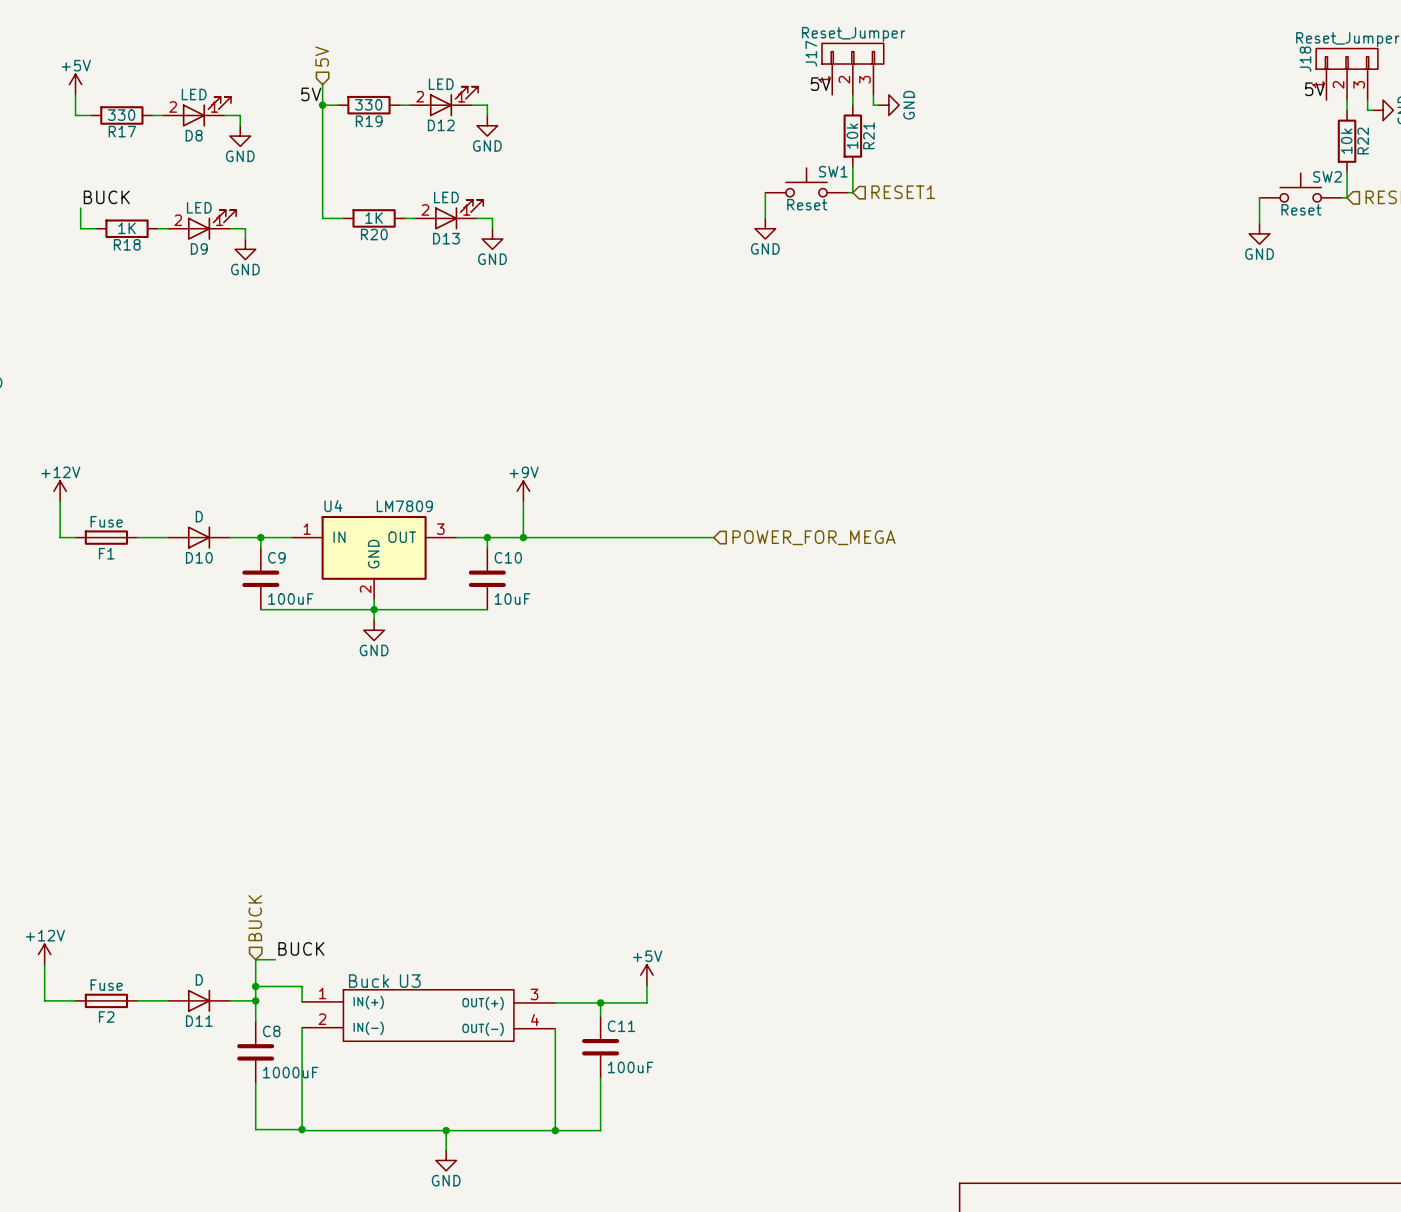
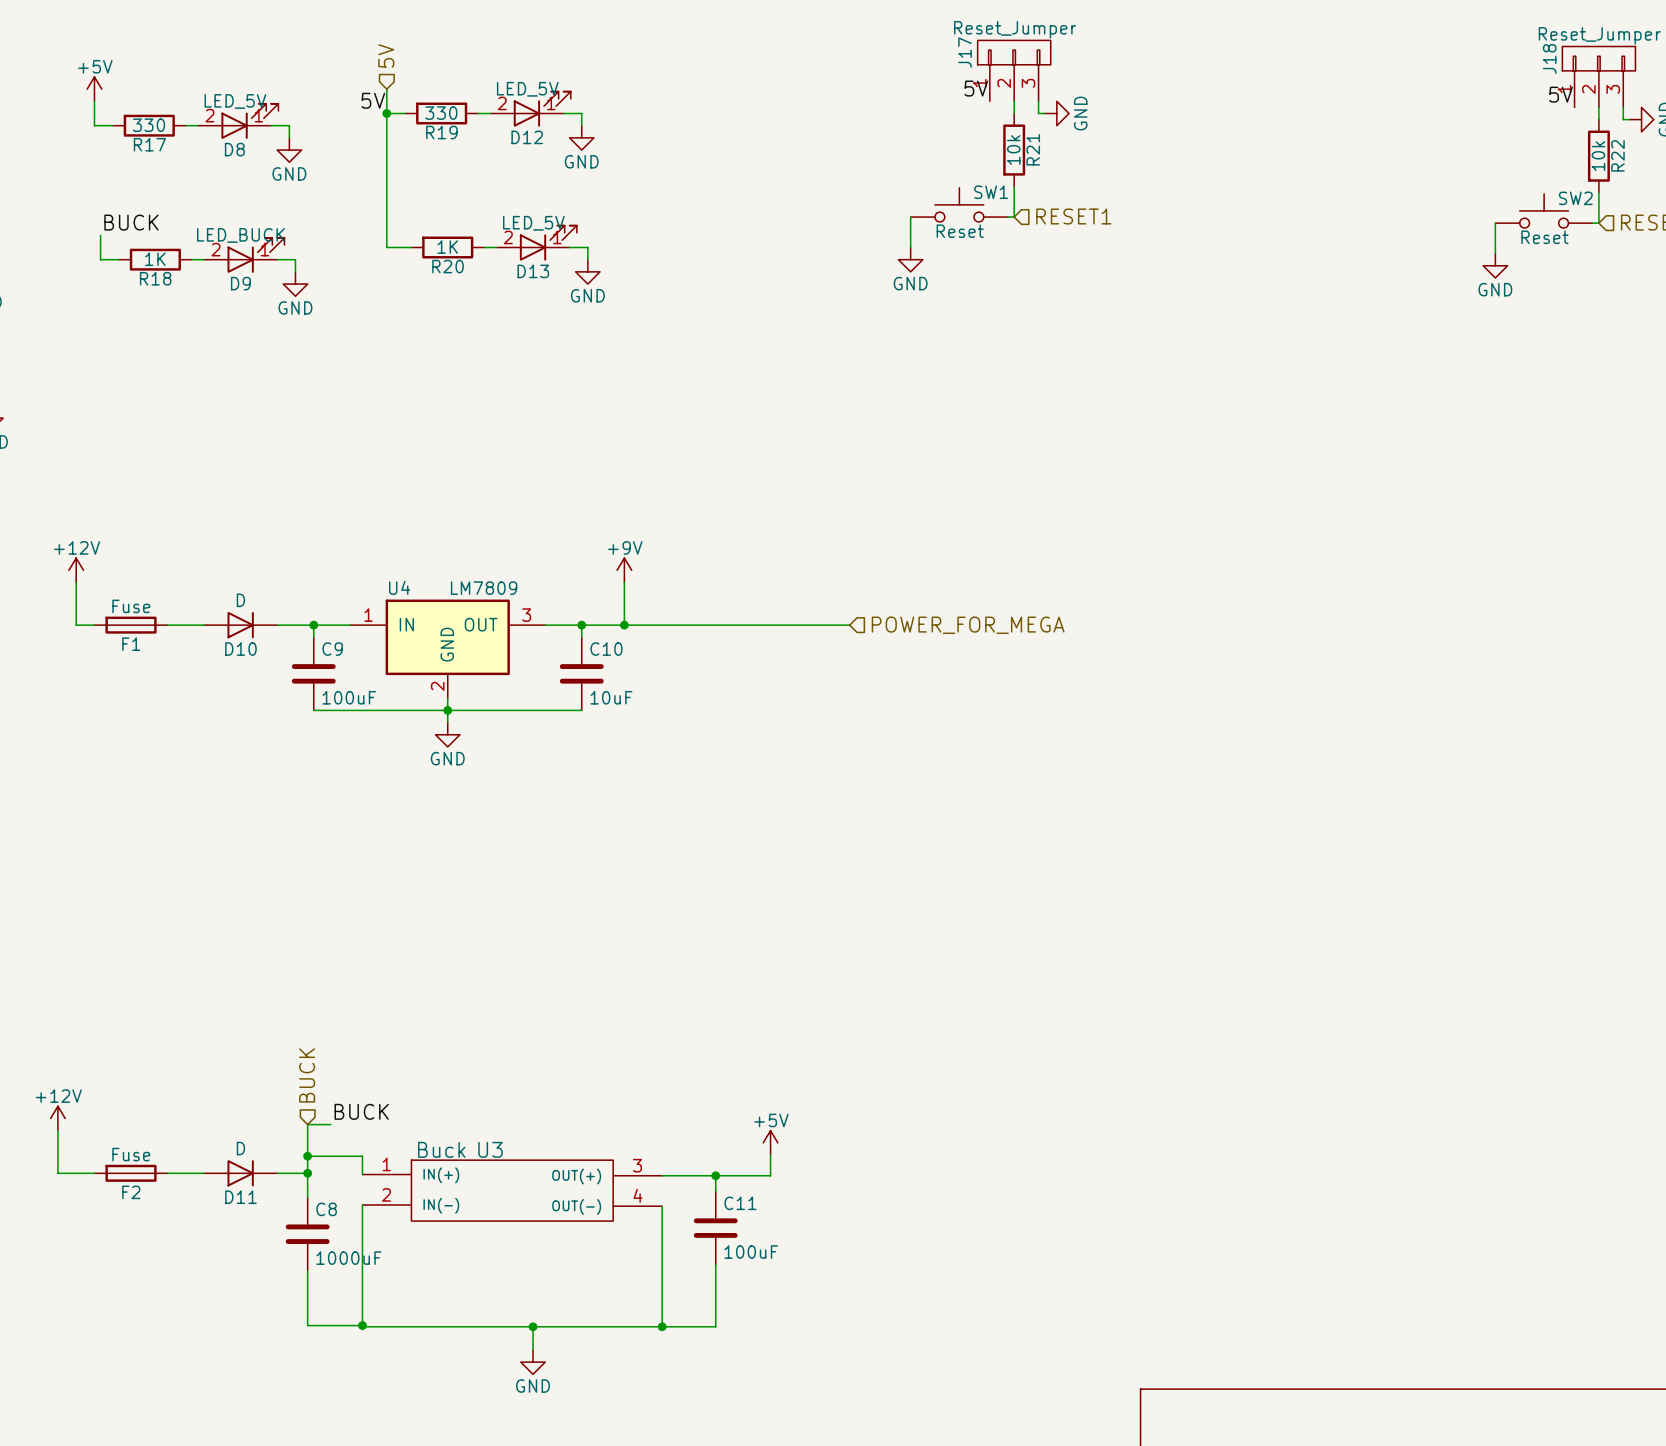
D12 value: LED (441, 84) -> LED_5V (527, 89)
D8 value: LED (194, 94) -> LED_5V (235, 101)
D13 value: LED (446, 197) -> LED_5V (533, 223)
D9 value: LED (199, 207) -> LED_BUCK (240, 235)

